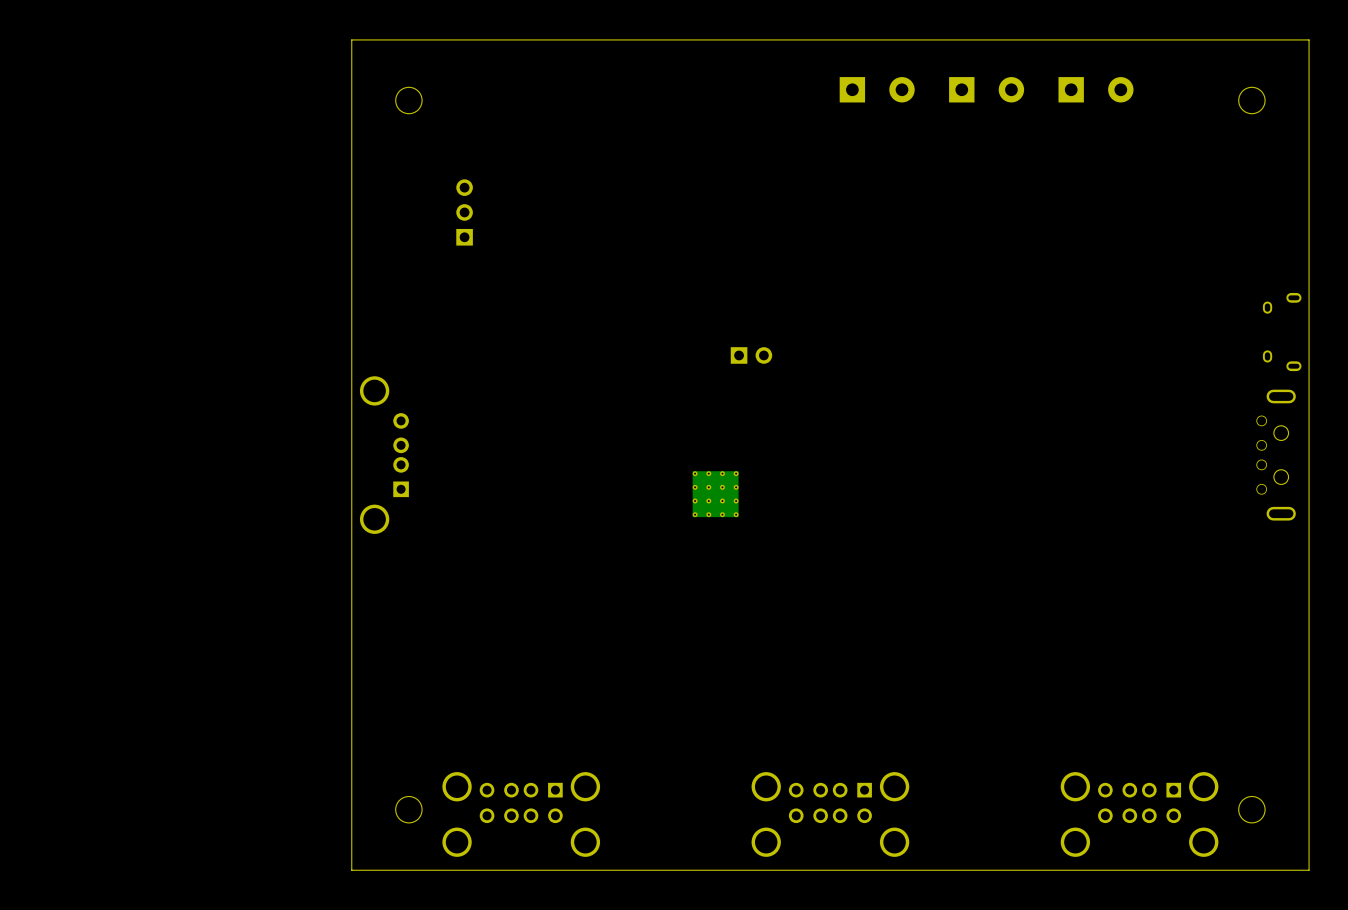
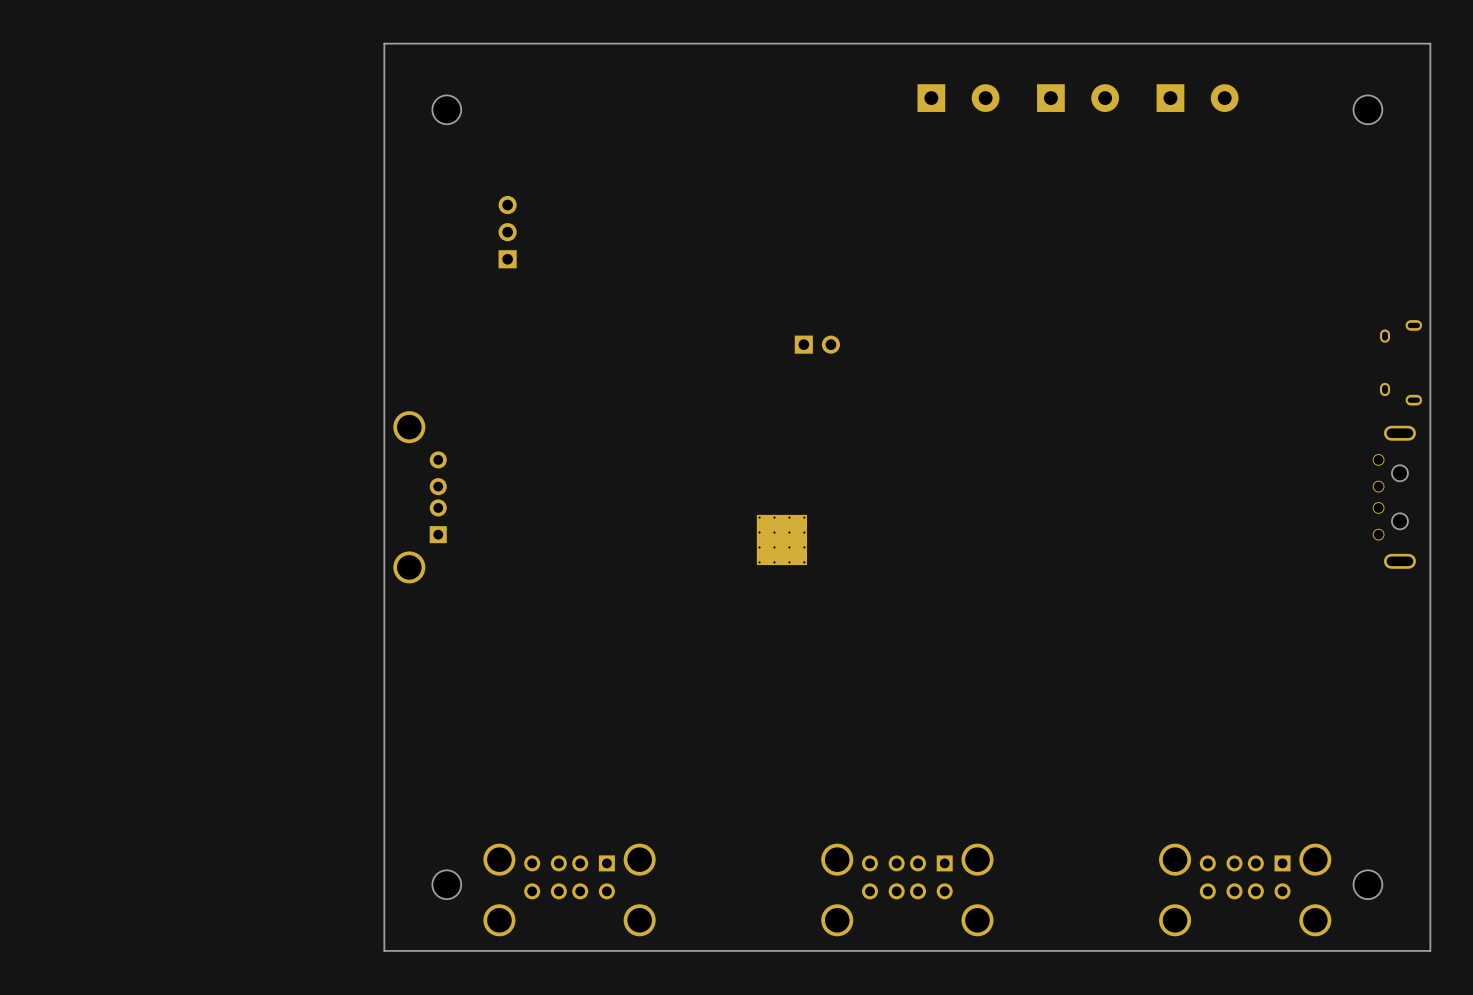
part position: (751, 355) -> (817, 344)

